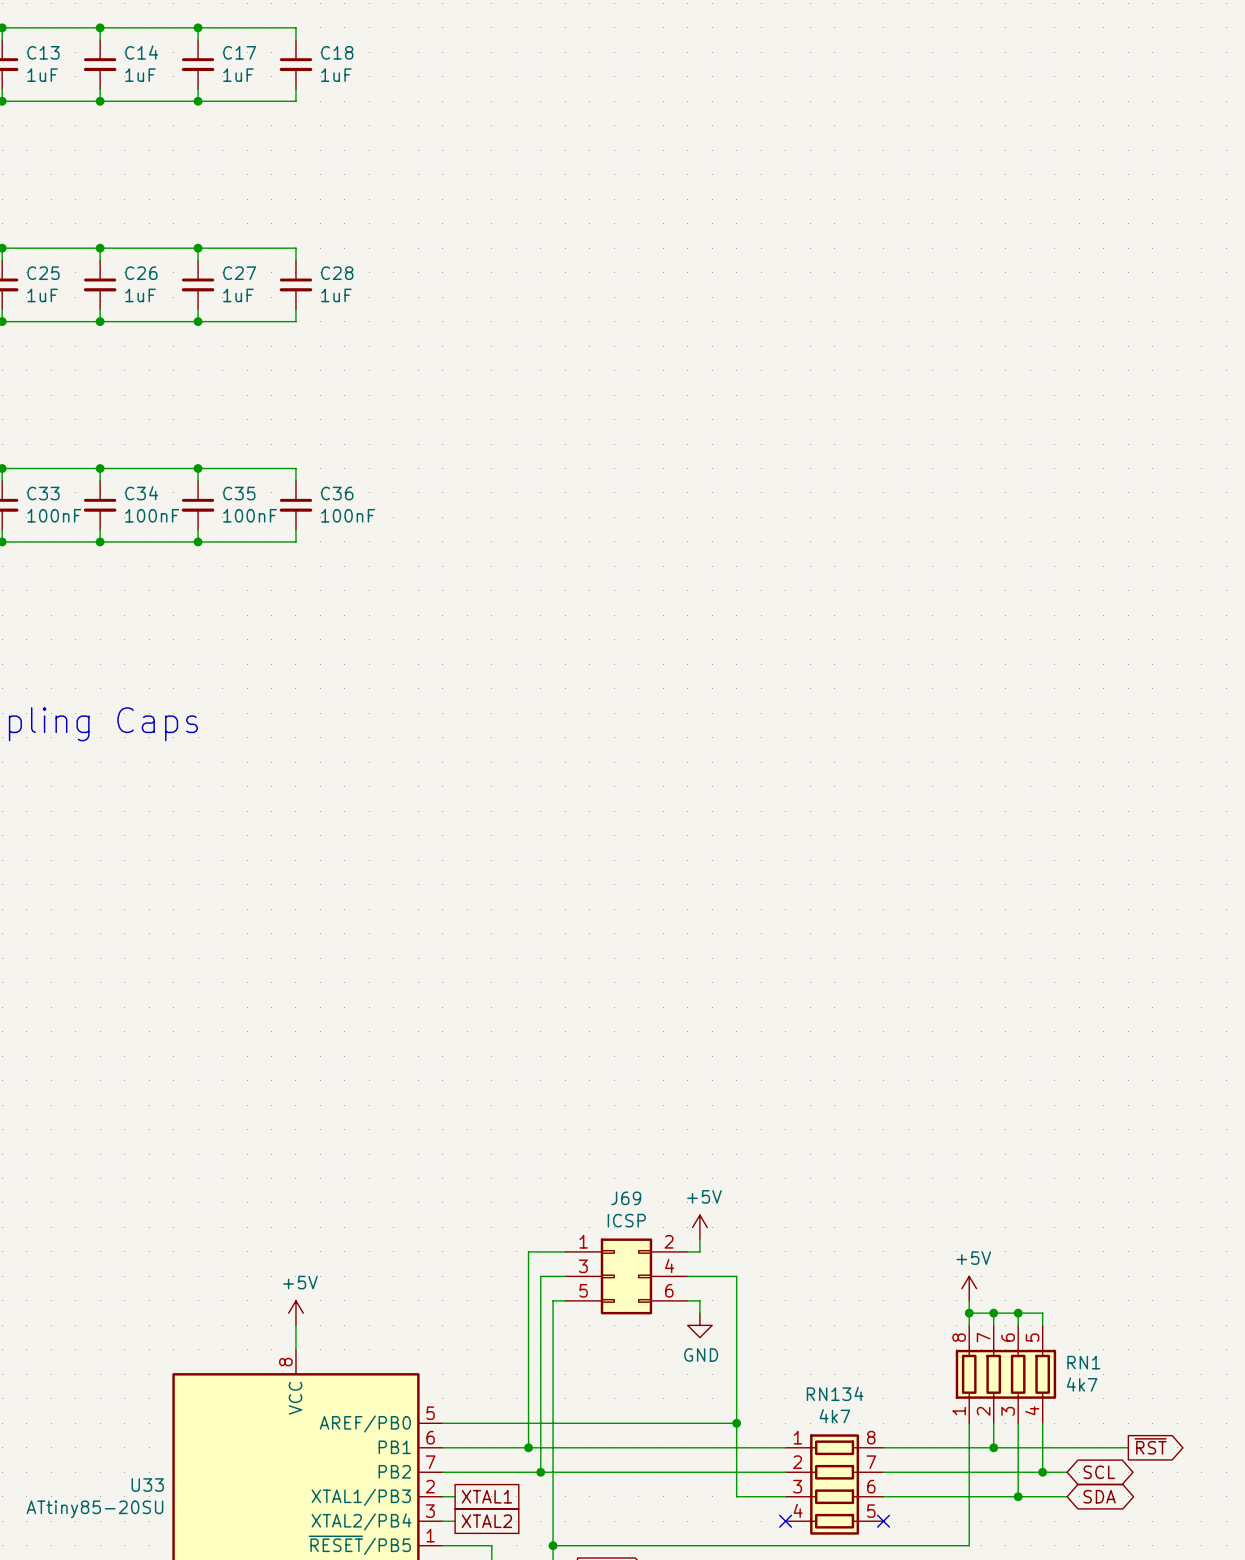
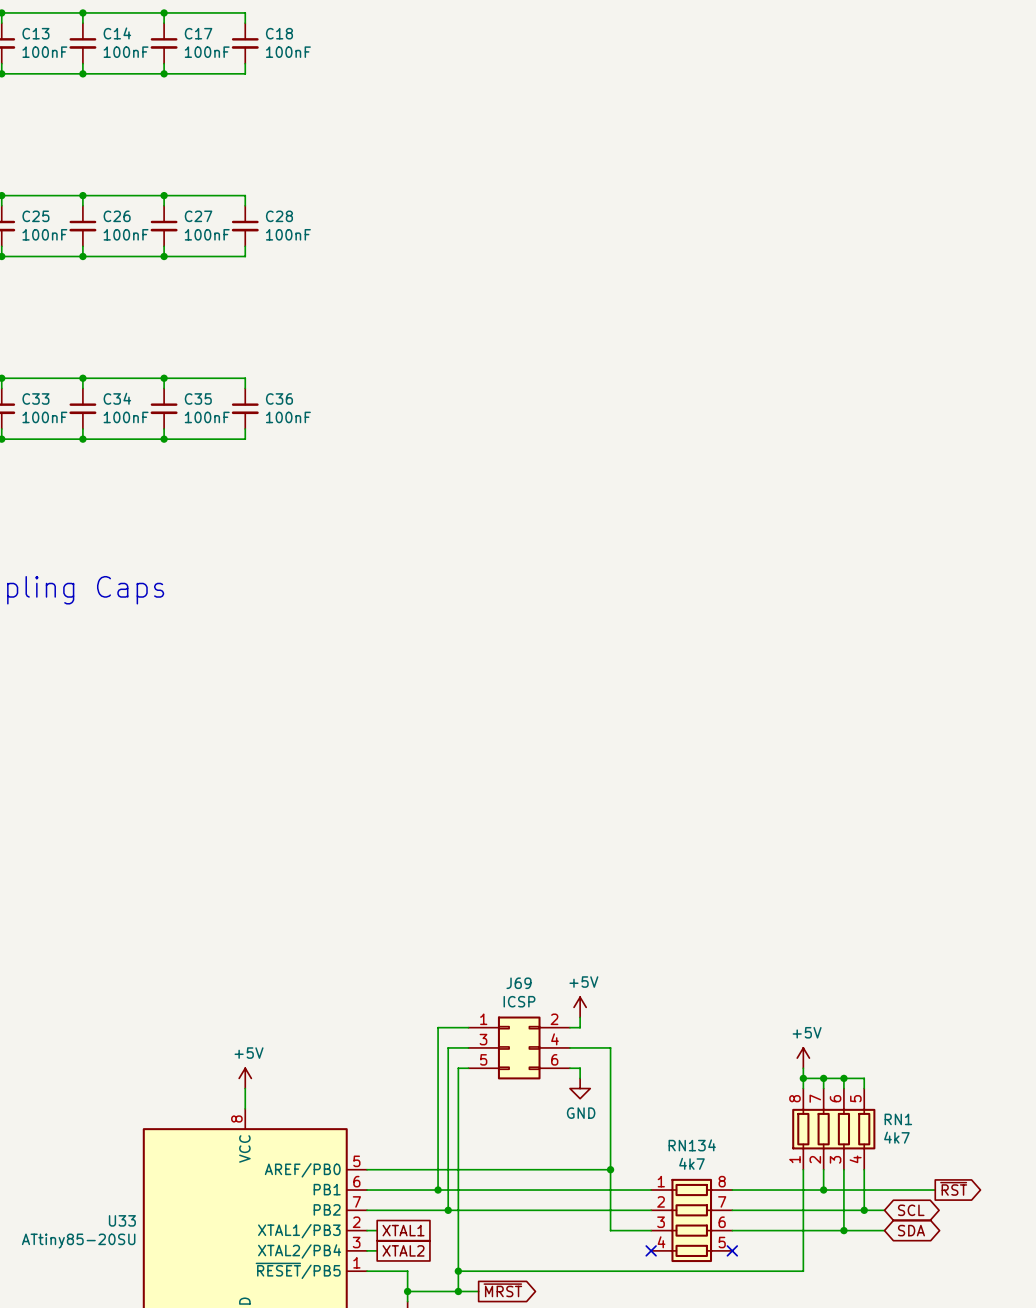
C13 value: 1uF (42, 75) -> 100nF (44, 52)
C14 value: 1uF (140, 75) -> 100nF (126, 52)
C17 value: 1uF (238, 75) -> 100nF (207, 52)
C18 value: 1uF (336, 75) -> 100nF (288, 52)
C25 value: 1uF (42, 295) -> 100nF (44, 234)
C26 value: 1uF (140, 295) -> 100nF (126, 234)
C27 value: 1uF (238, 295) -> 100nF (207, 234)
C28 value: 1uF (336, 295) -> 100nF (288, 234)

